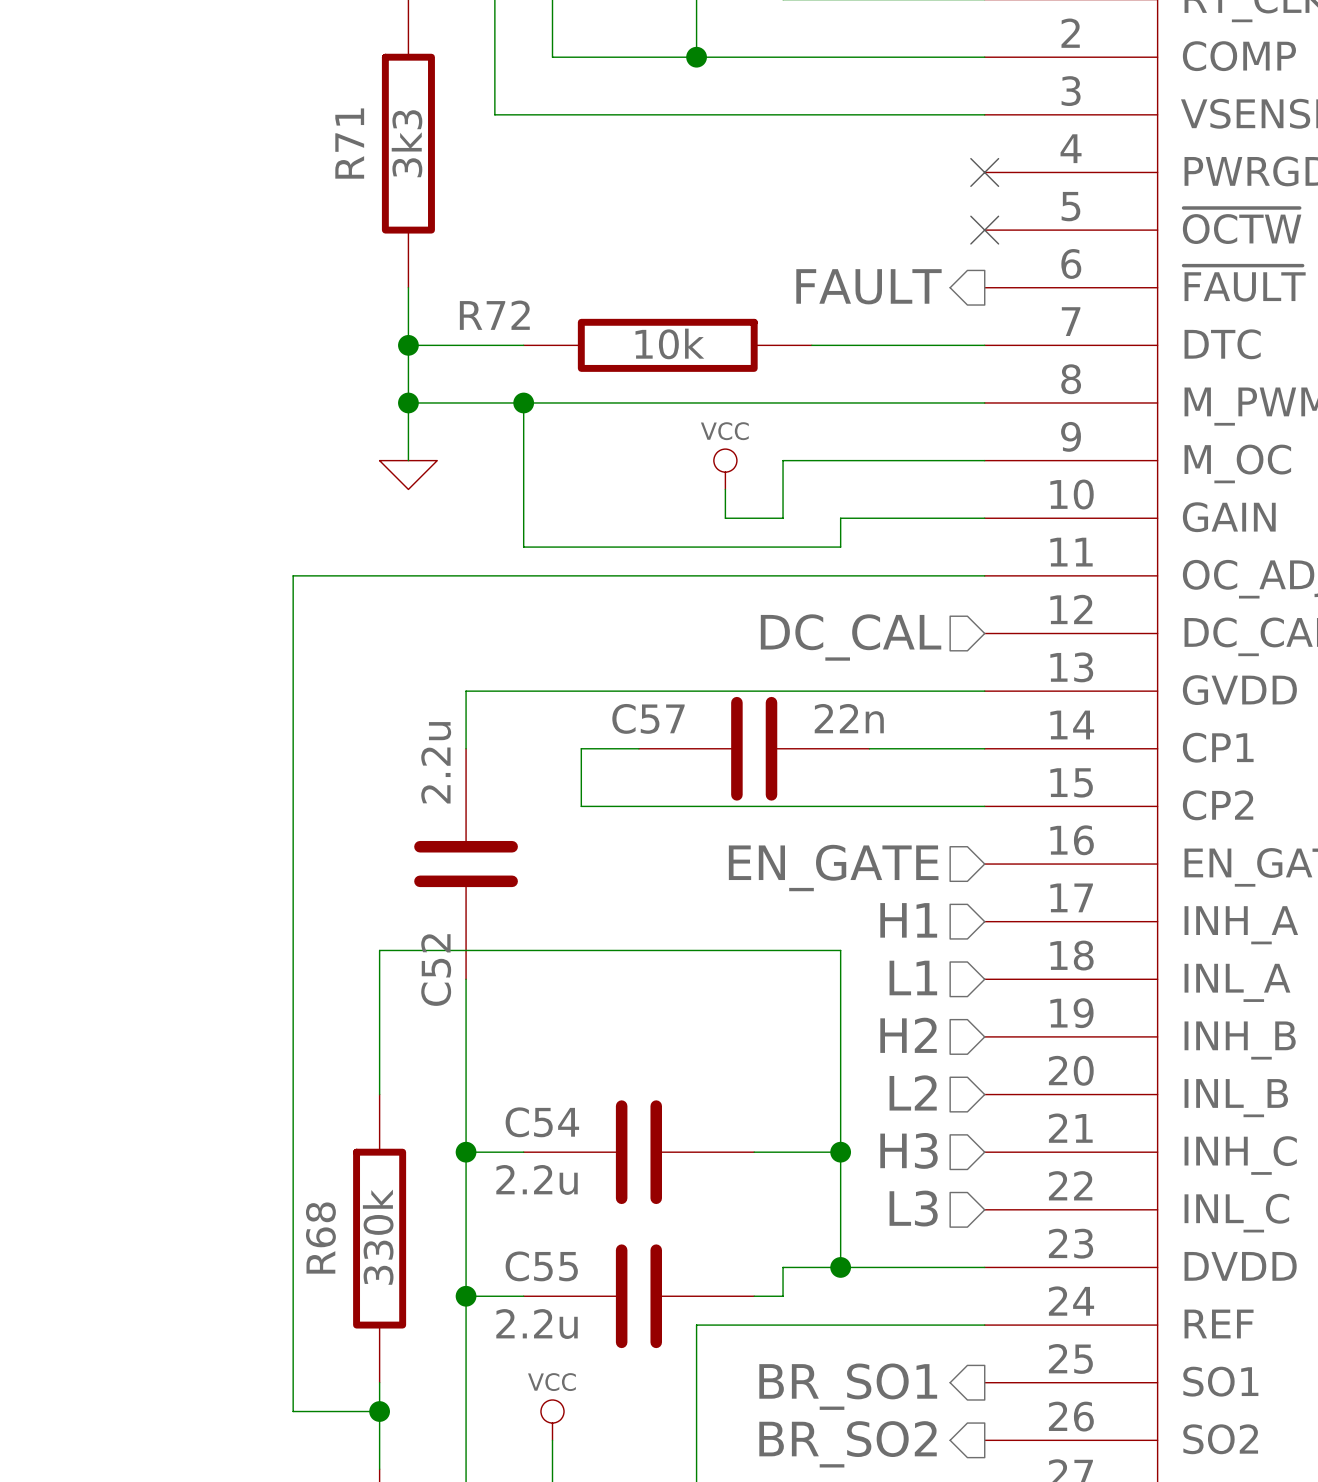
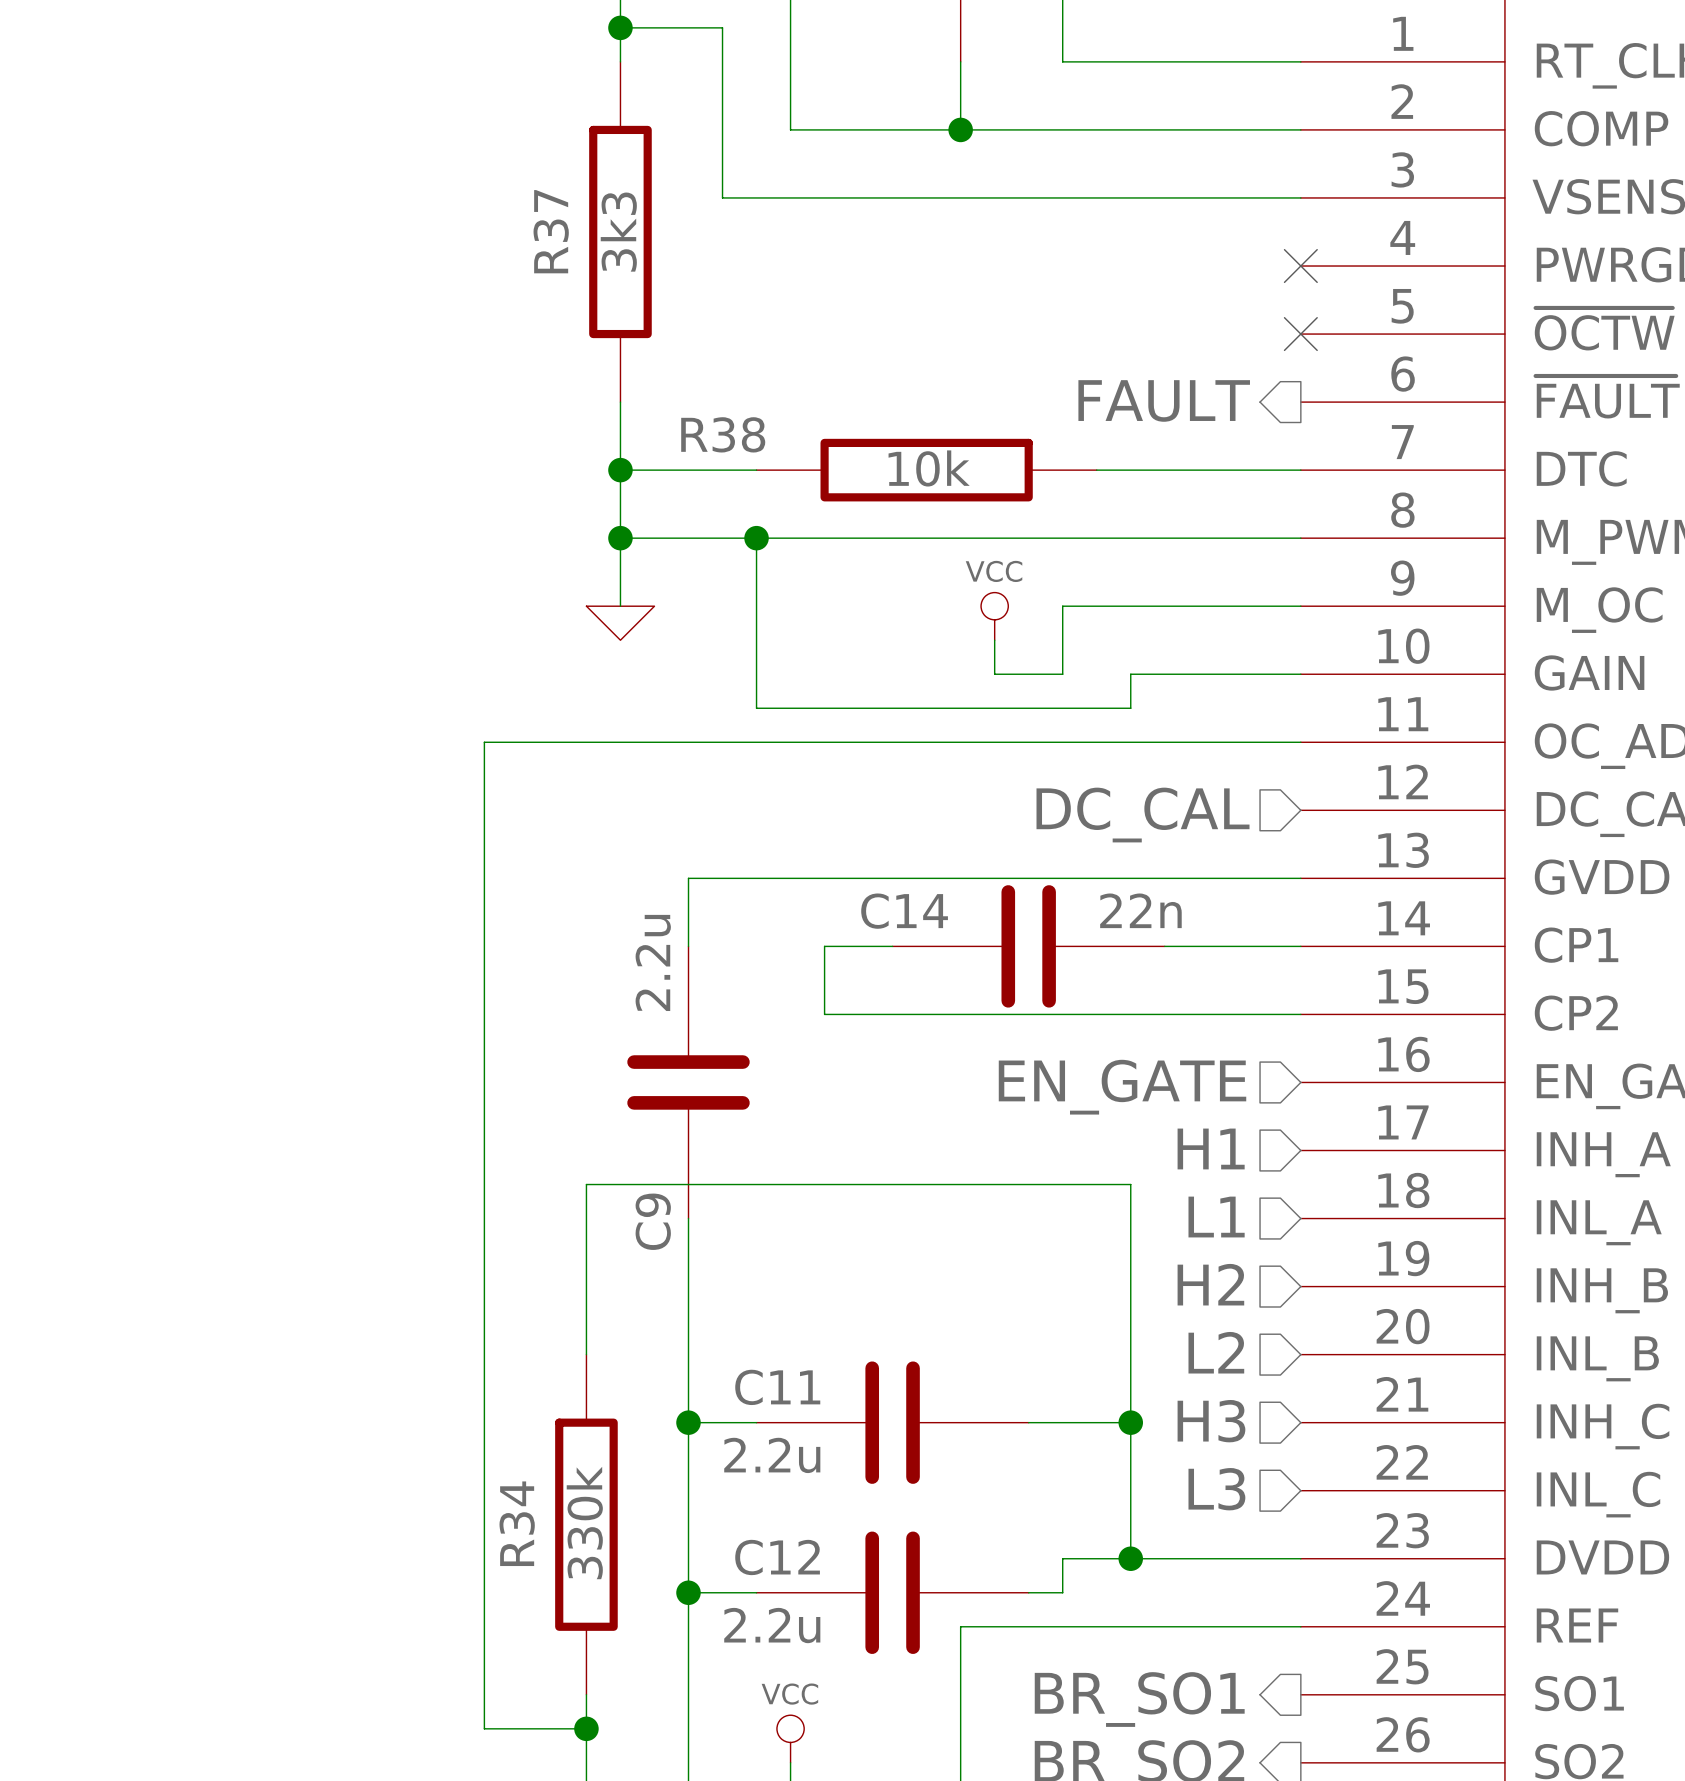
R71 name: R71 (349, 143) -> R37 (551, 231)
R72 name: R72 (494, 315) -> R38 (723, 434)
C57 name: C57 (648, 718) -> C14 (904, 911)
C52 name: C52 (436, 970) -> C9 (653, 1221)
C54 name: C54 (542, 1122) -> C11 (777, 1387)
R68 name: R68 (320, 1238) -> R34 (517, 1523)
C55 name: C55 (541, 1266) -> C12 (777, 1557)

